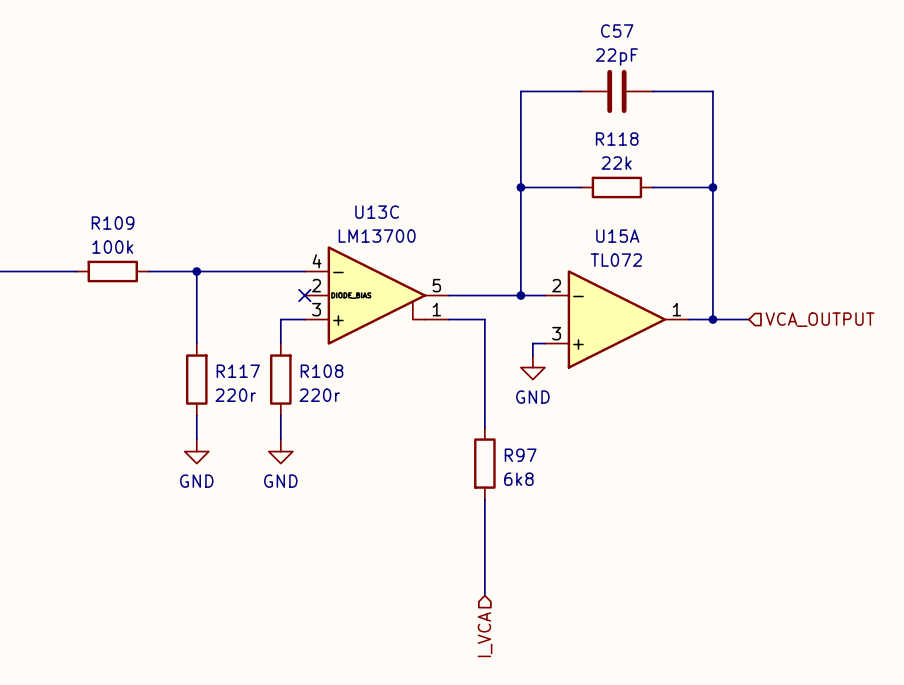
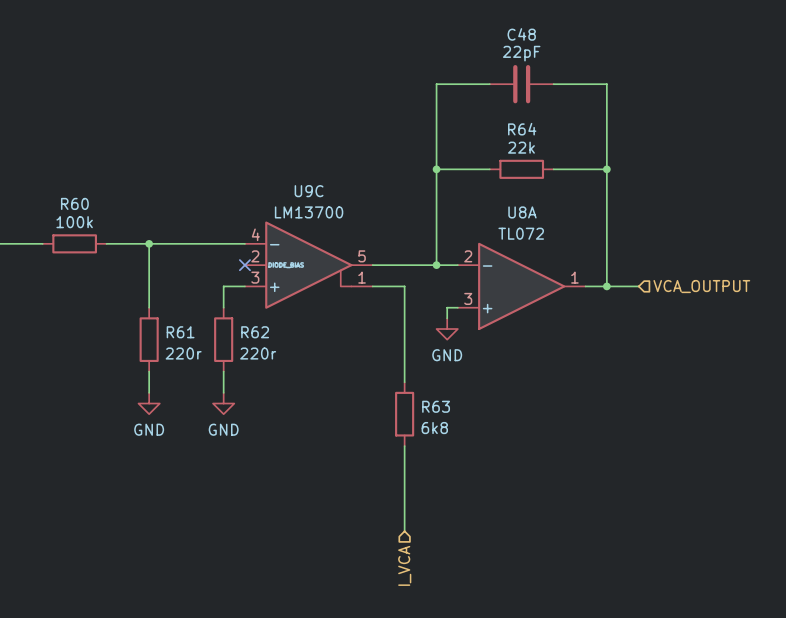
C57 name: C57 (617, 30) -> C48 (521, 34)
R118 name: R118 (617, 139) -> R64 (522, 129)
U13C name: U13C (377, 212) -> U9C (309, 191)
R109 name: R109 (113, 223) -> R60 (74, 203)
U15A name: U15A (617, 236) -> U8A (522, 212)
R117 name: R117 (238, 371) -> R61 (180, 332)
R108 name: R108 (322, 371) -> R62 (255, 332)
R97 name: R97 (520, 455) -> R63 (436, 406)

